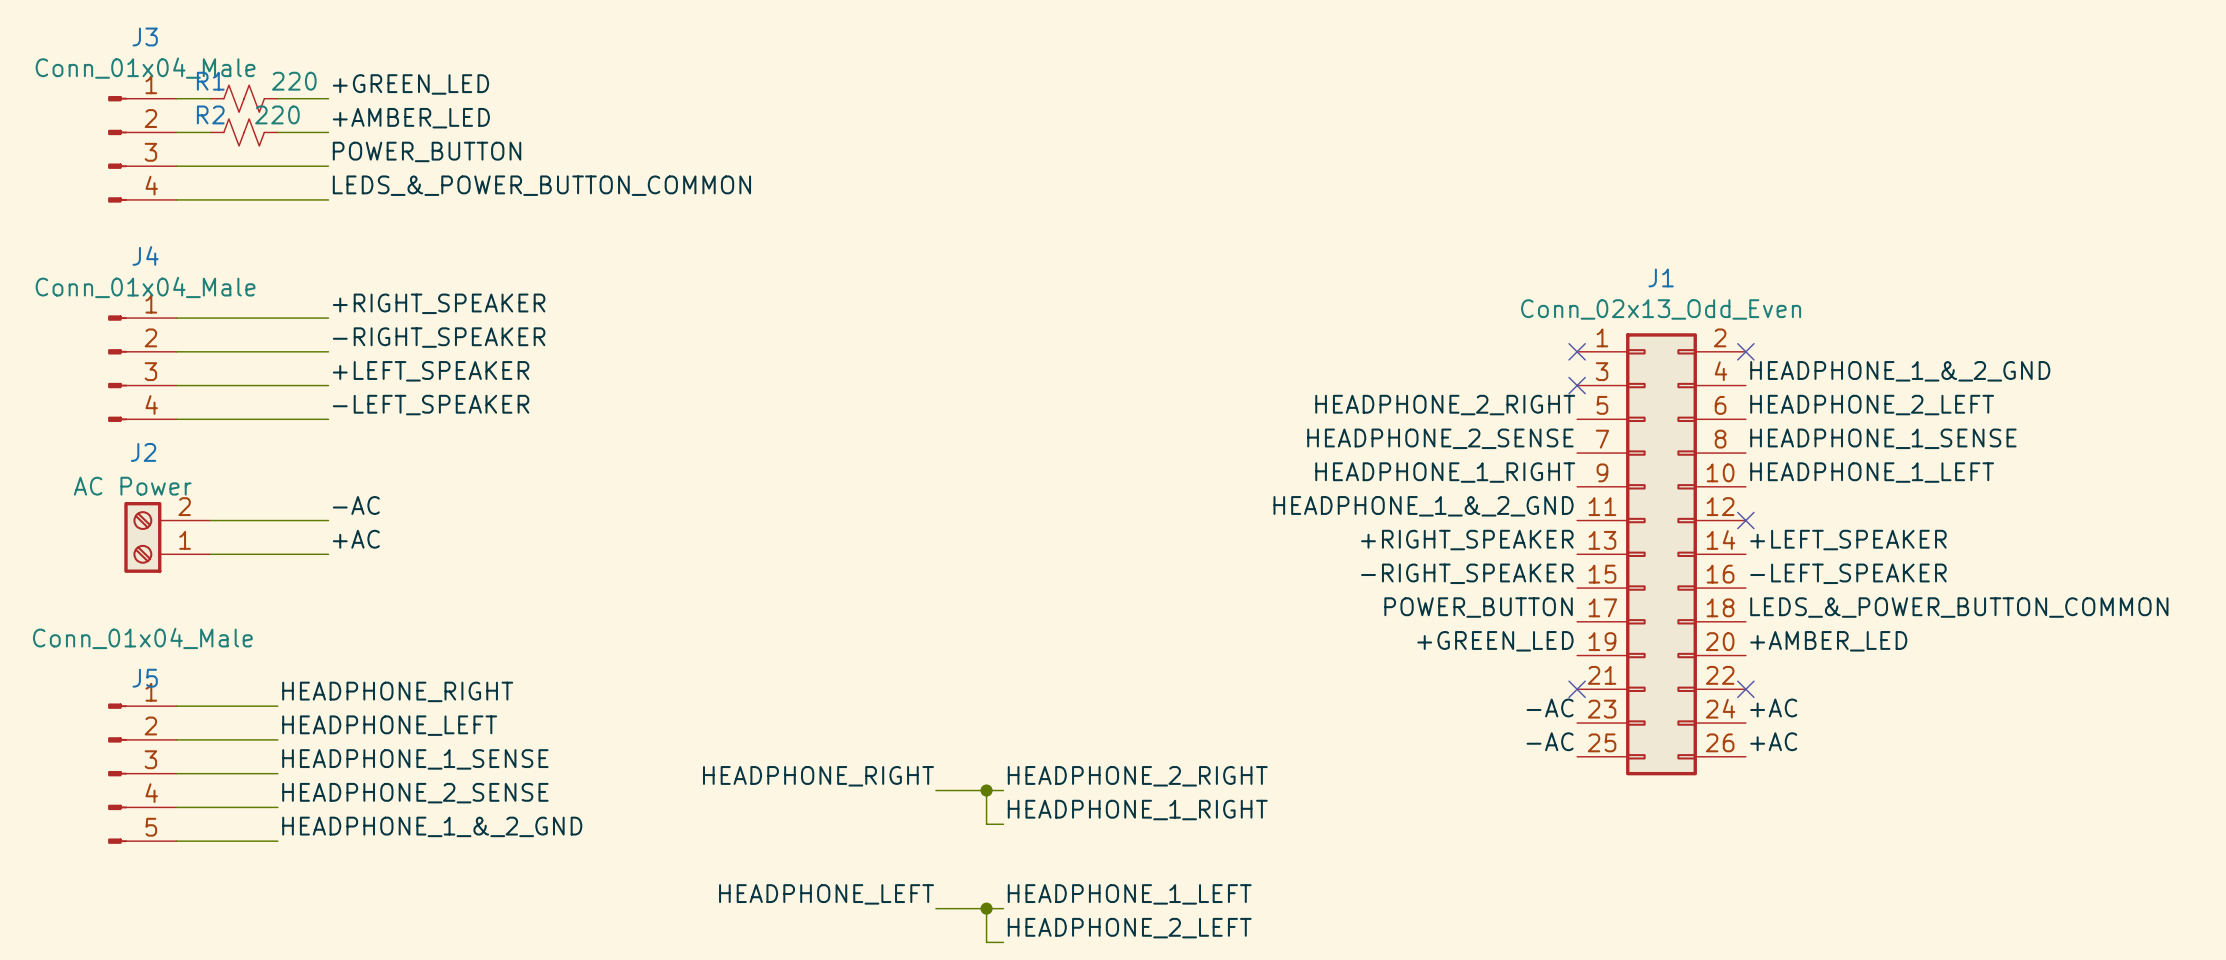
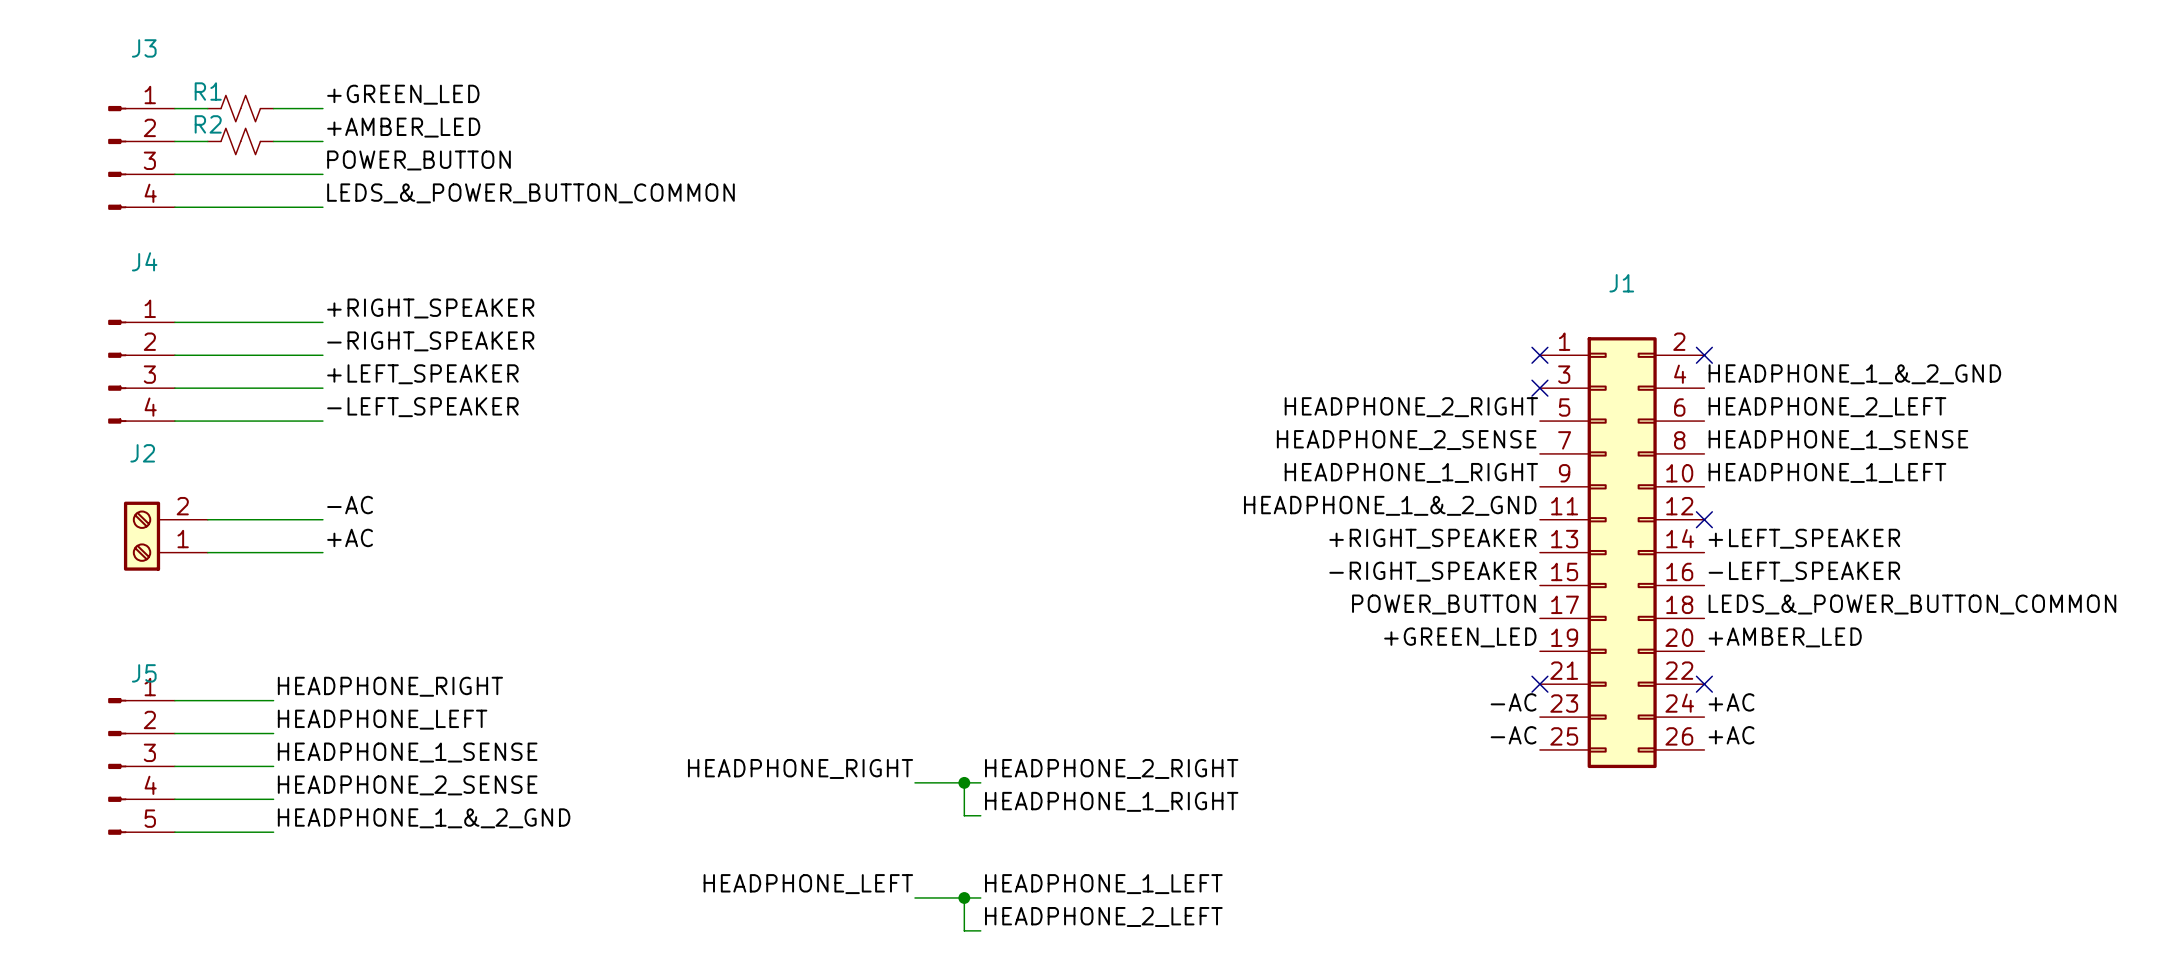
J3 value: Conn_01x04_Male (145, 68) -> none
R1 value: 220 (294, 81) -> none
R2 value: 220 (277, 114) -> none
J4 value: Conn_01x04_Male (145, 287) -> none
J1 value: Conn_02x13_Odd_Even (1661, 309) -> none
J2 value: AC Power (132, 486) -> none
J5 value: Conn_01x04_Male (142, 638) -> none

